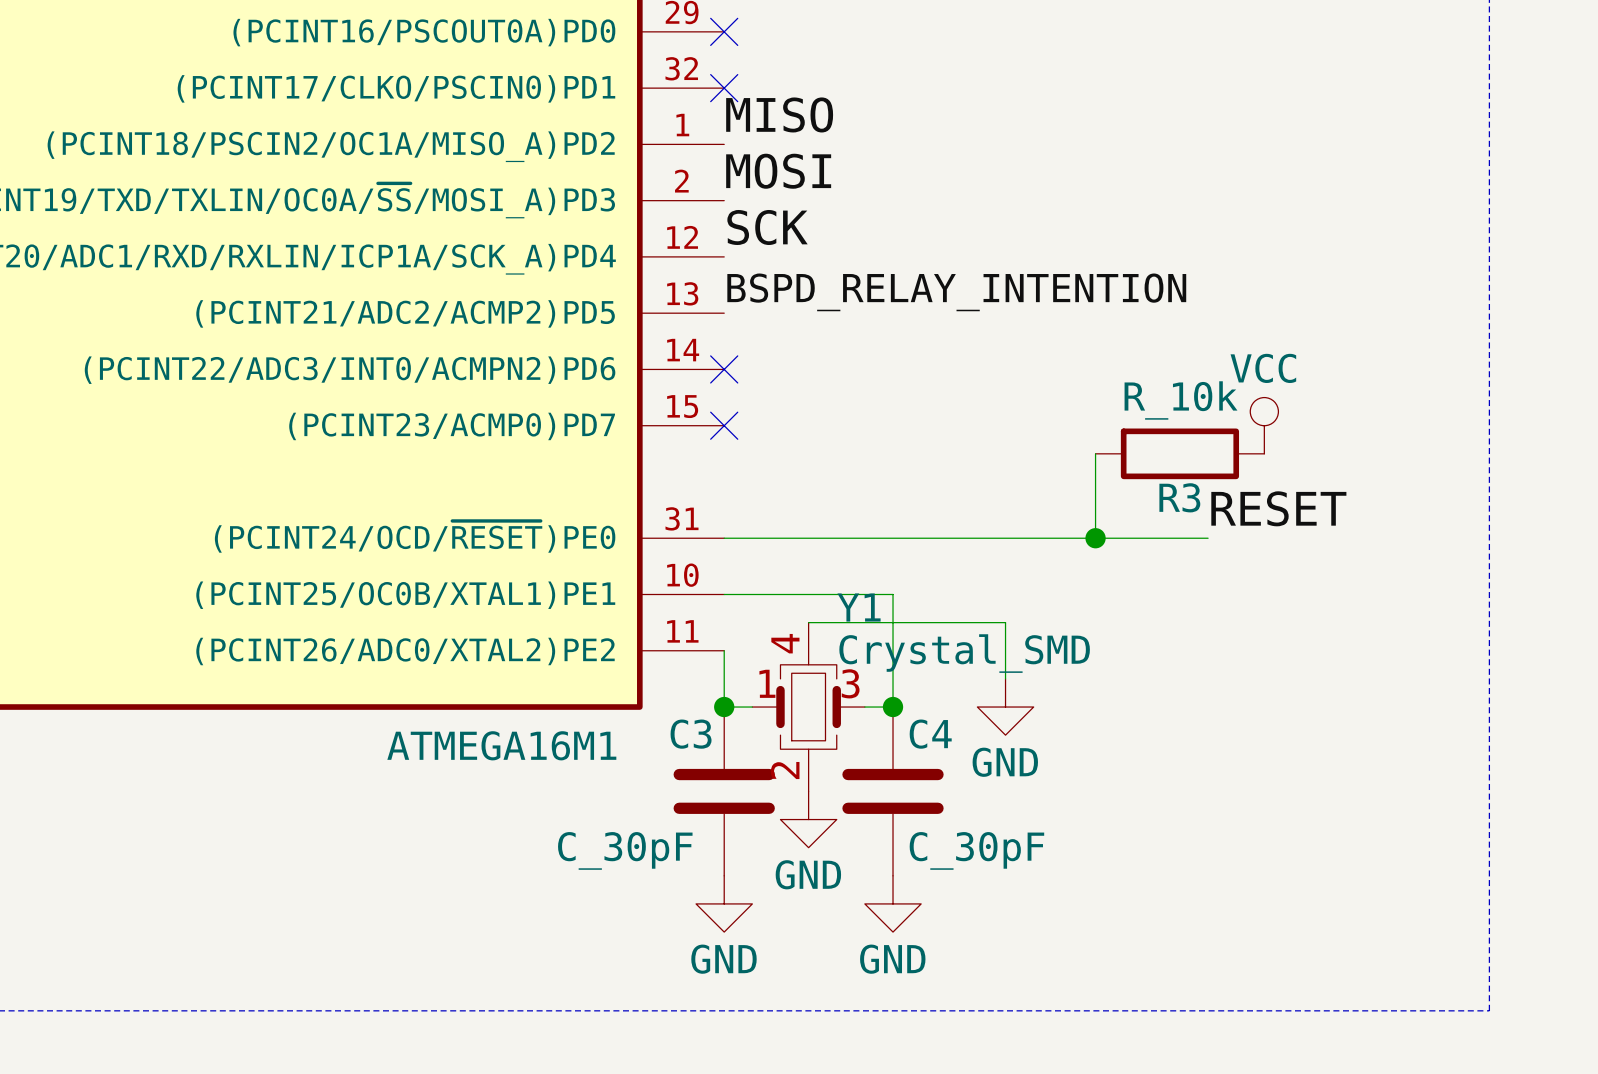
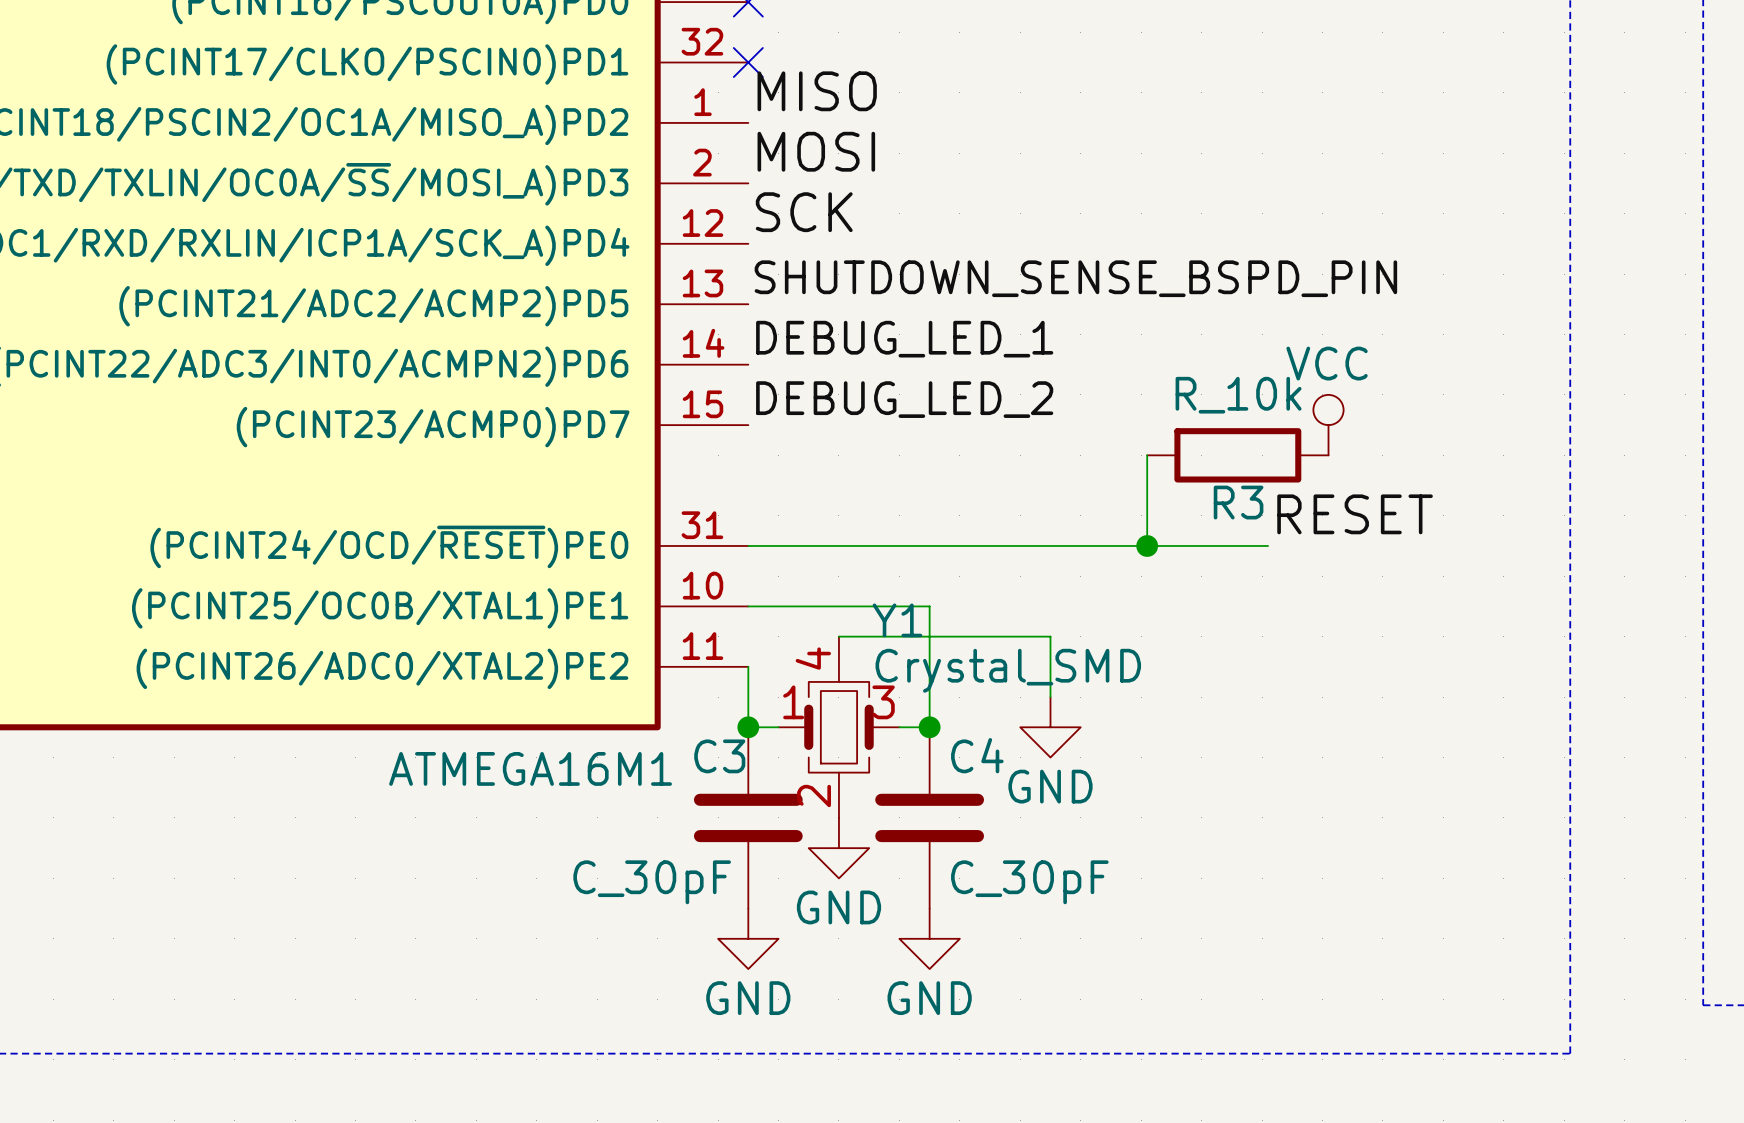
label: BSPD_RELAY_INTENTION (956, 292) -> SHUTDOWN_SENSE_BSPD_PIN (1075, 278)
label: none -> DEBUG_LED_1 (904, 339)
no-connect mark: (724, 369) -> none
label: none -> DEBUG_LED_2 (904, 399)
no-connect mark: (724, 425) -> none

